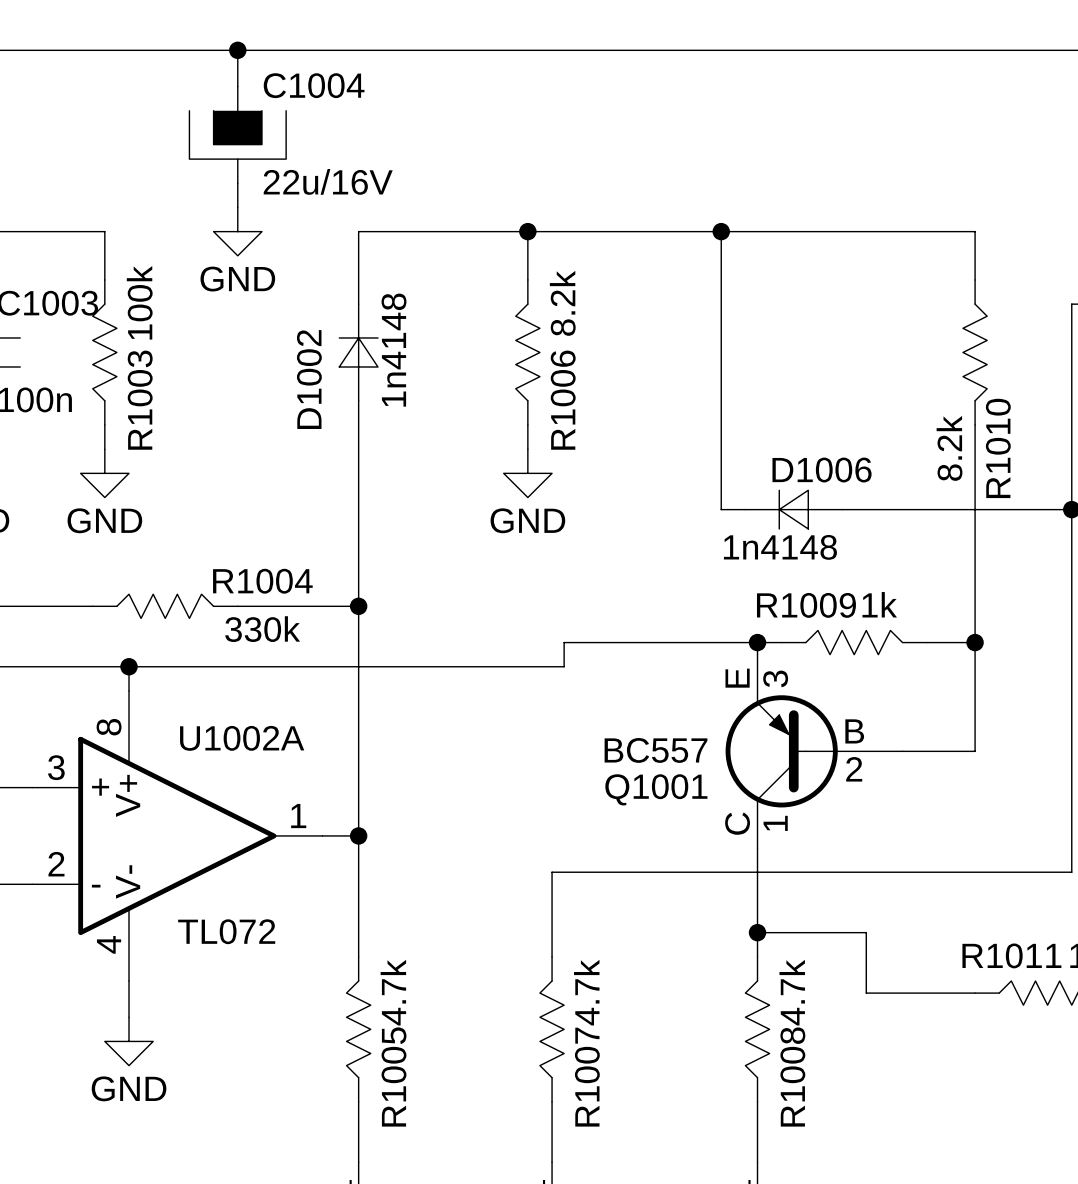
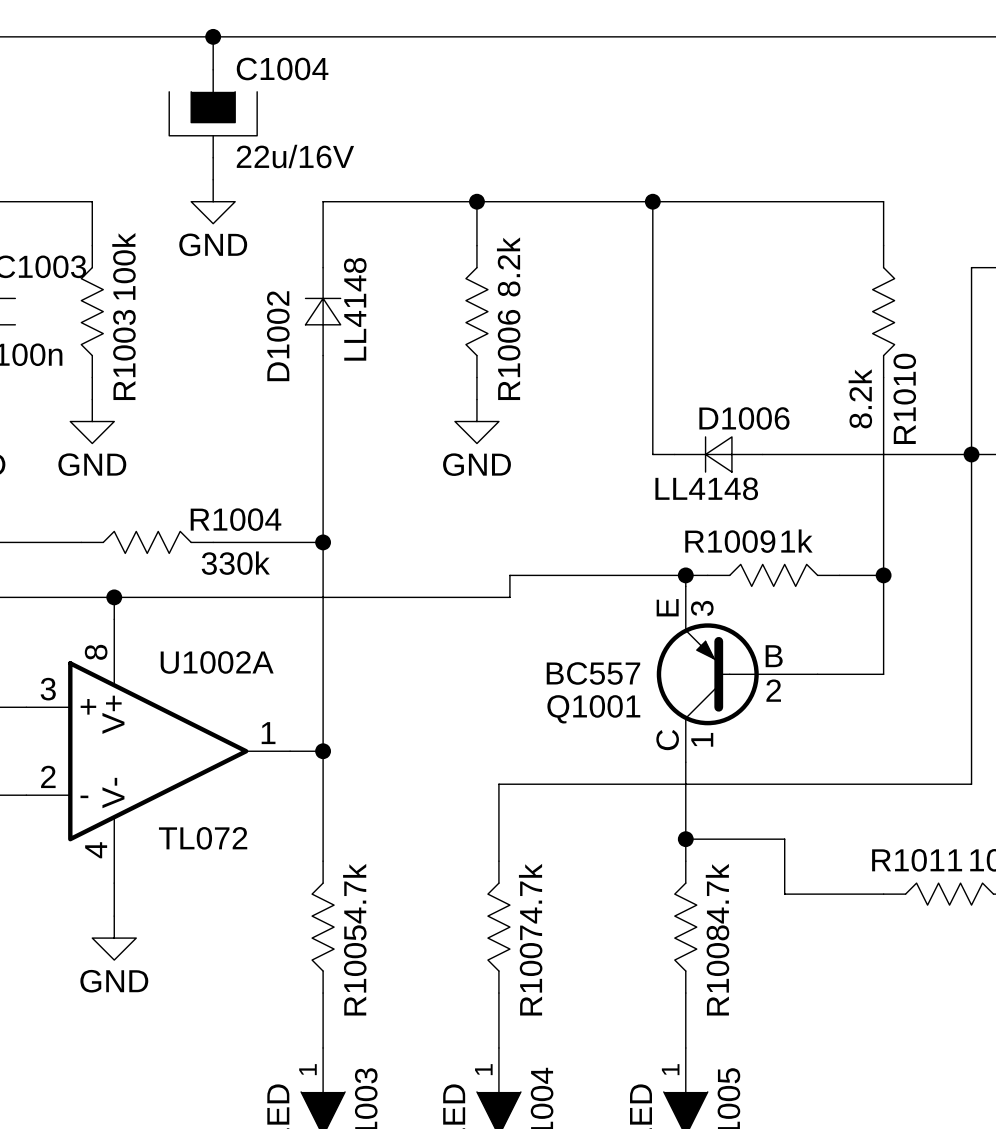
D1002 value: 1n4148 (394, 350) -> LL4148 (355, 309)
D1006 value: 1n4148 (780, 547) -> LL4148 (706, 488)

